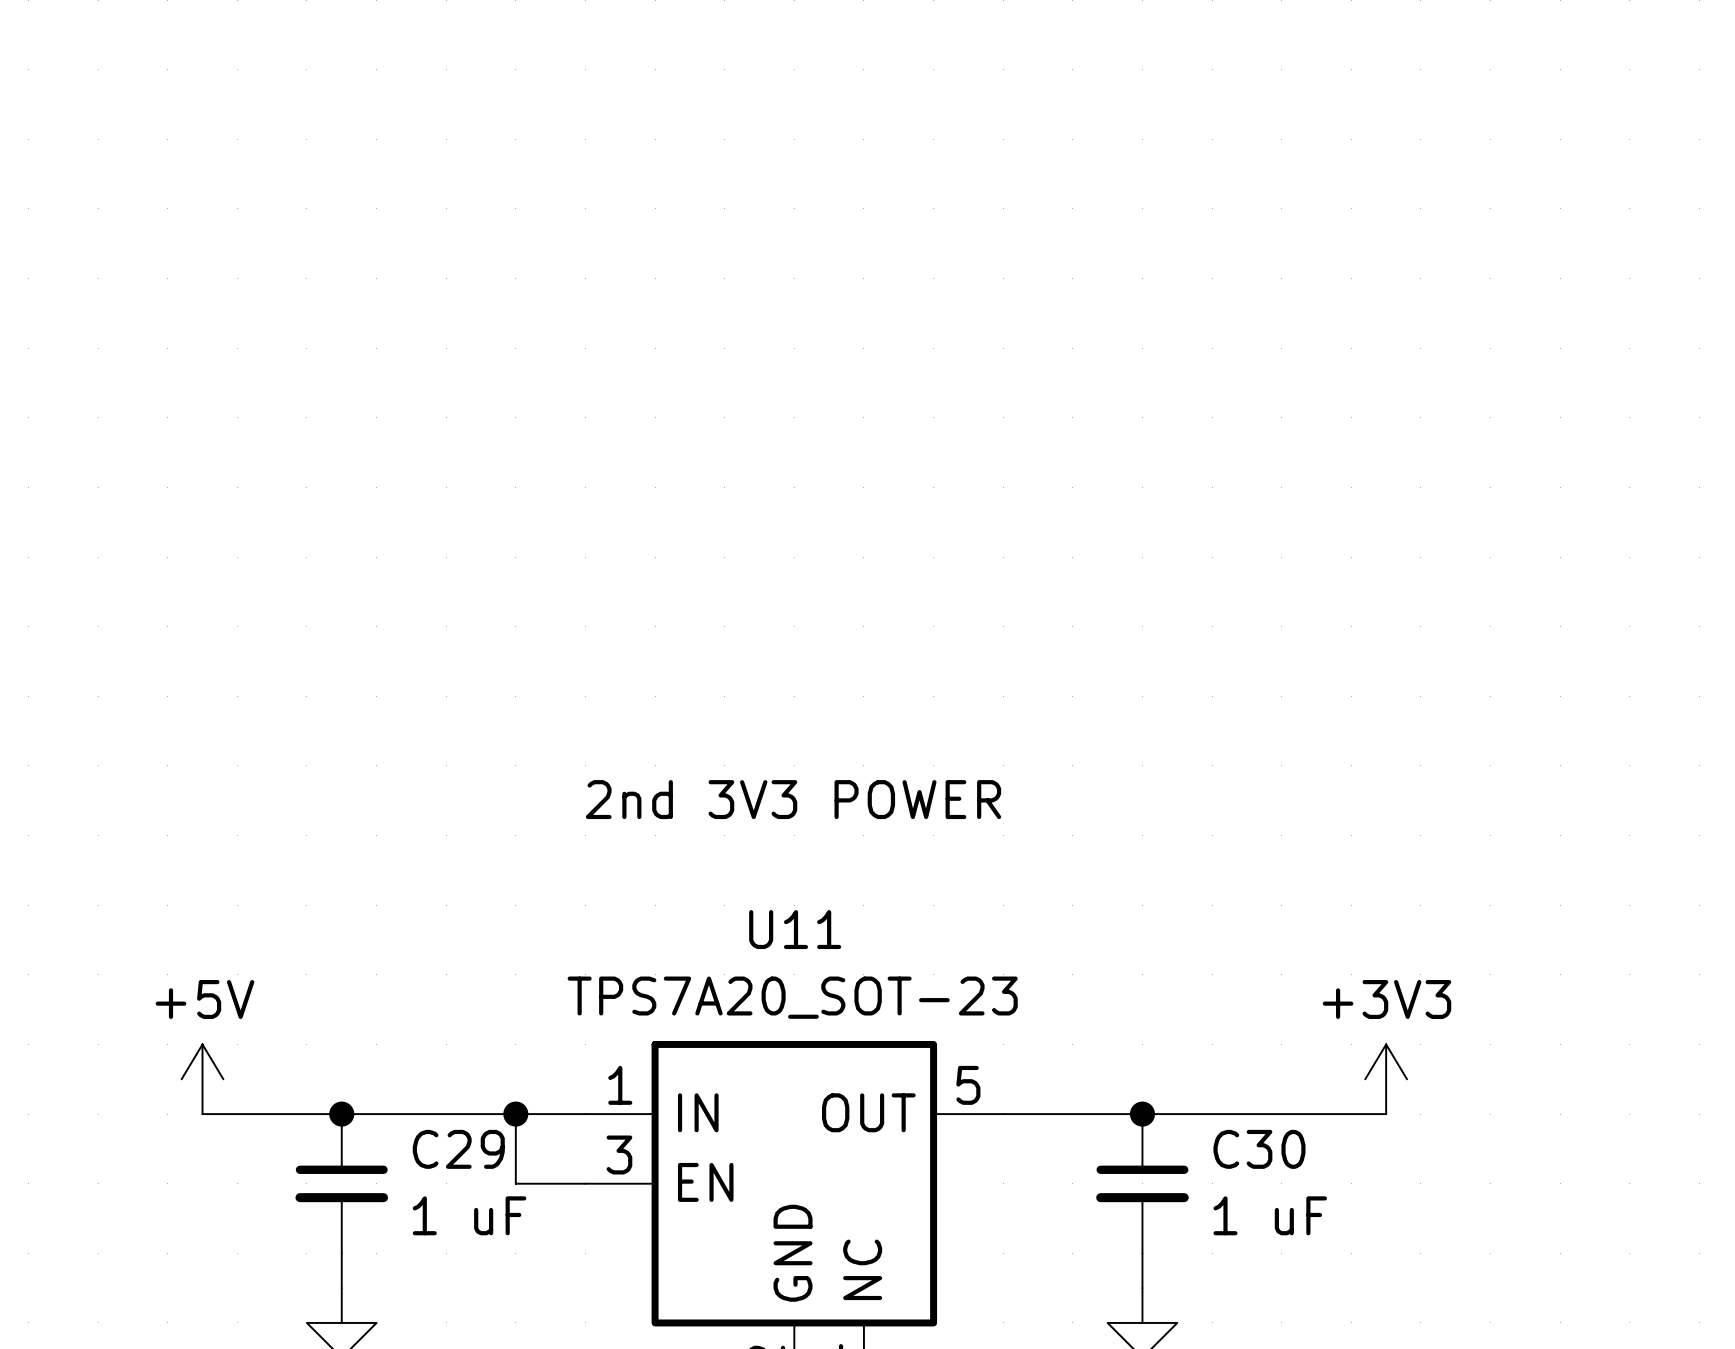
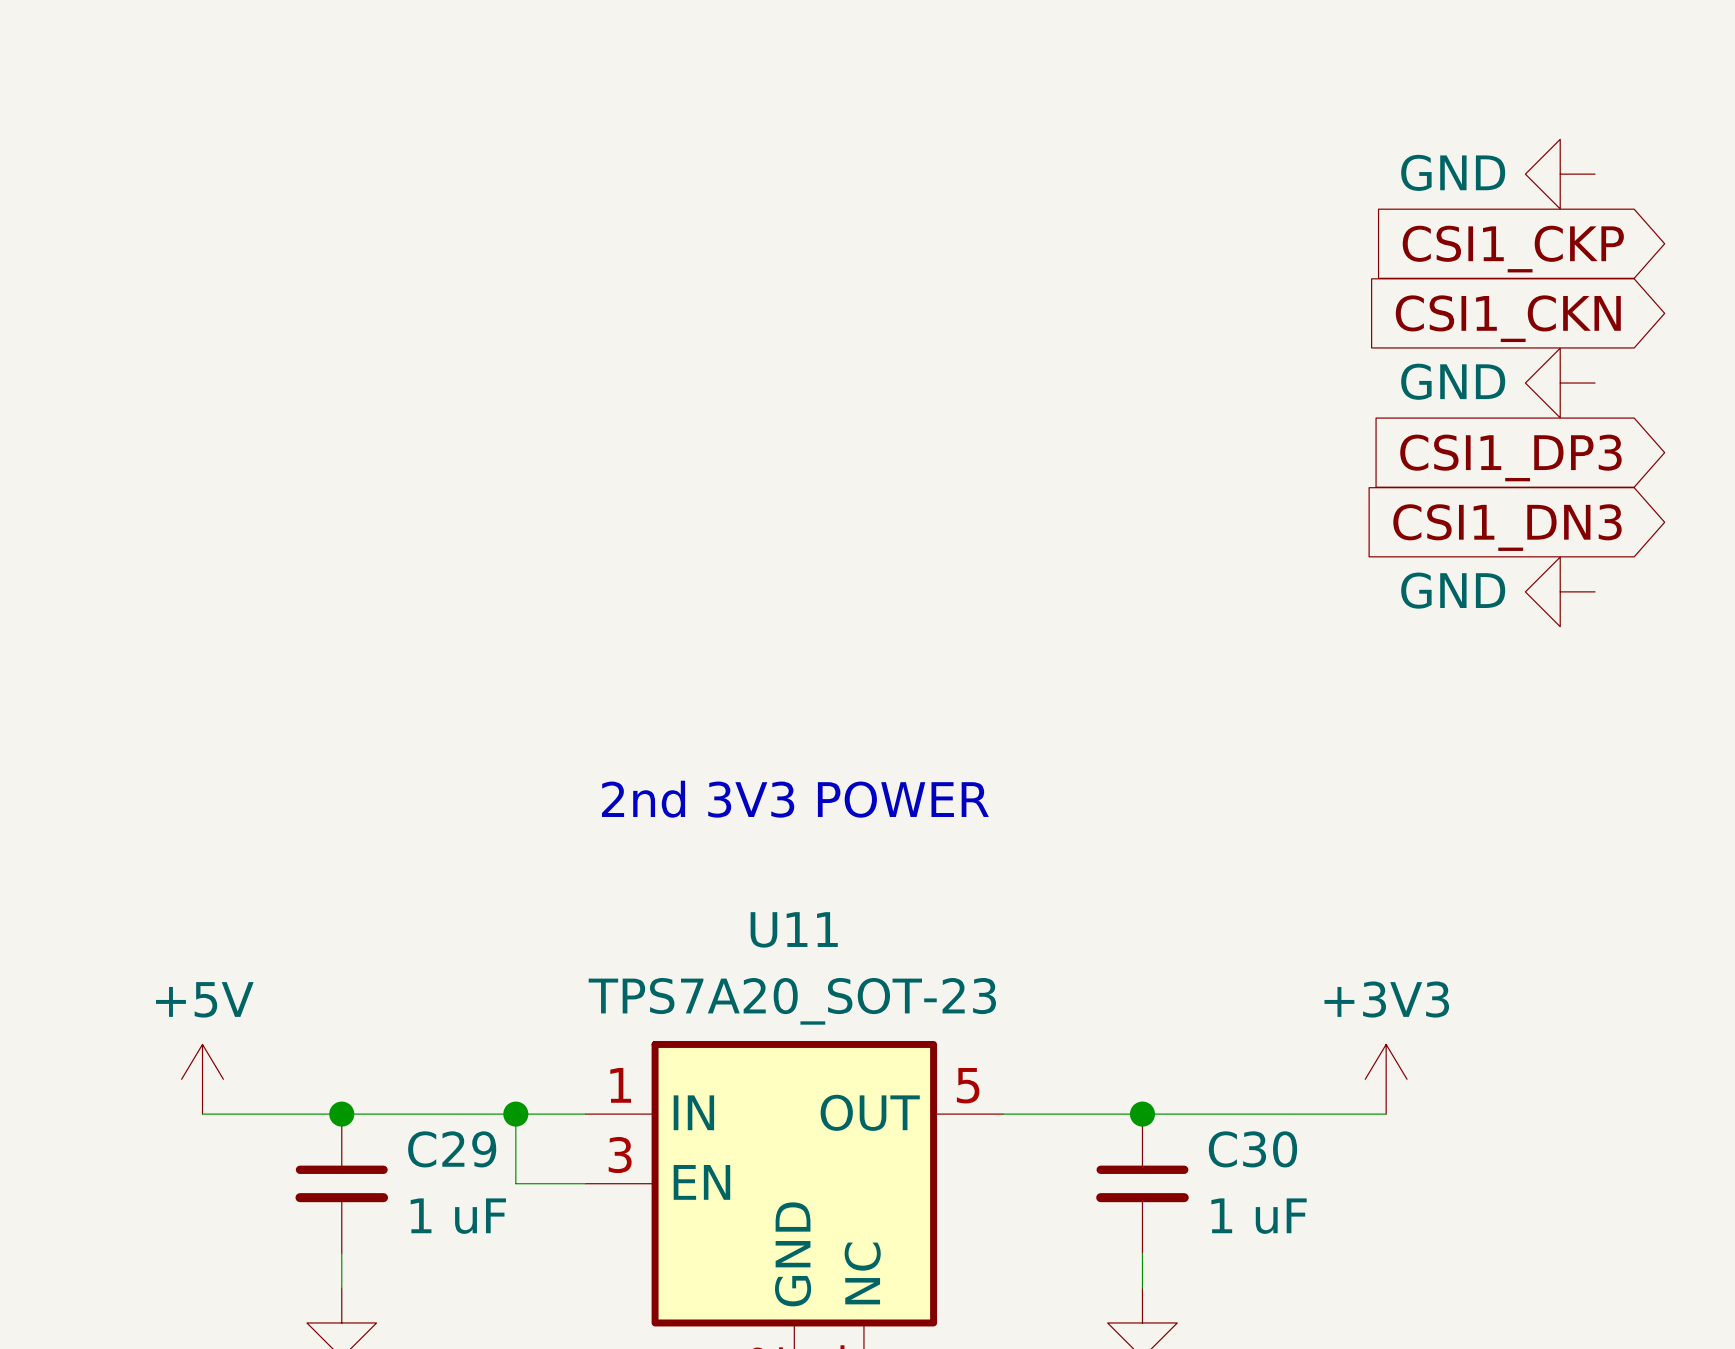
power symbol: none -> GND (1560, 174)
global label: none -> CSI1_CKP (1513, 249)
global label: none -> CSI1_CKN (1508, 318)
power symbol: none -> GND (1560, 383)
global label: none -> CSI1_DP3 (1510, 457)
global label: none -> CSI1_DN3 (1507, 527)
power symbol: none -> GND (1560, 591)

